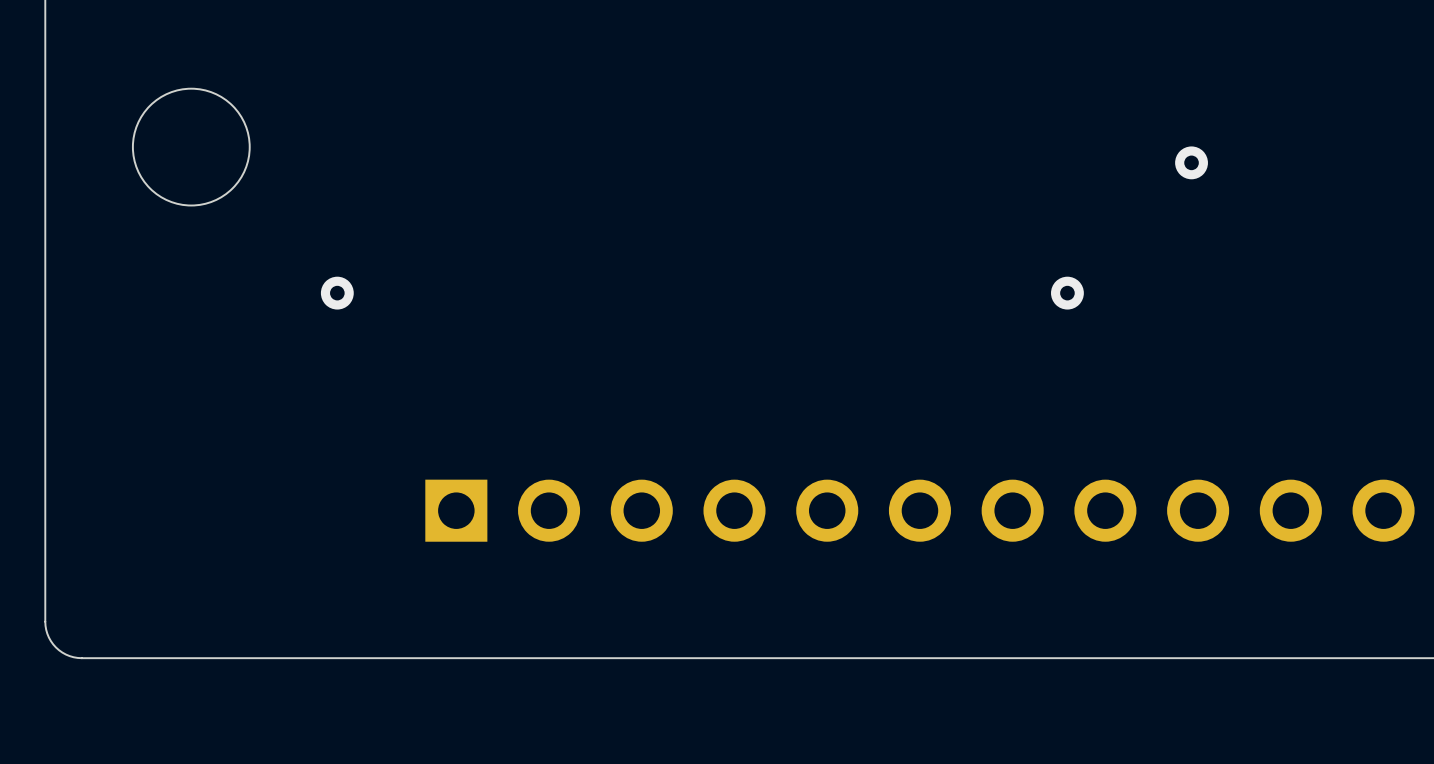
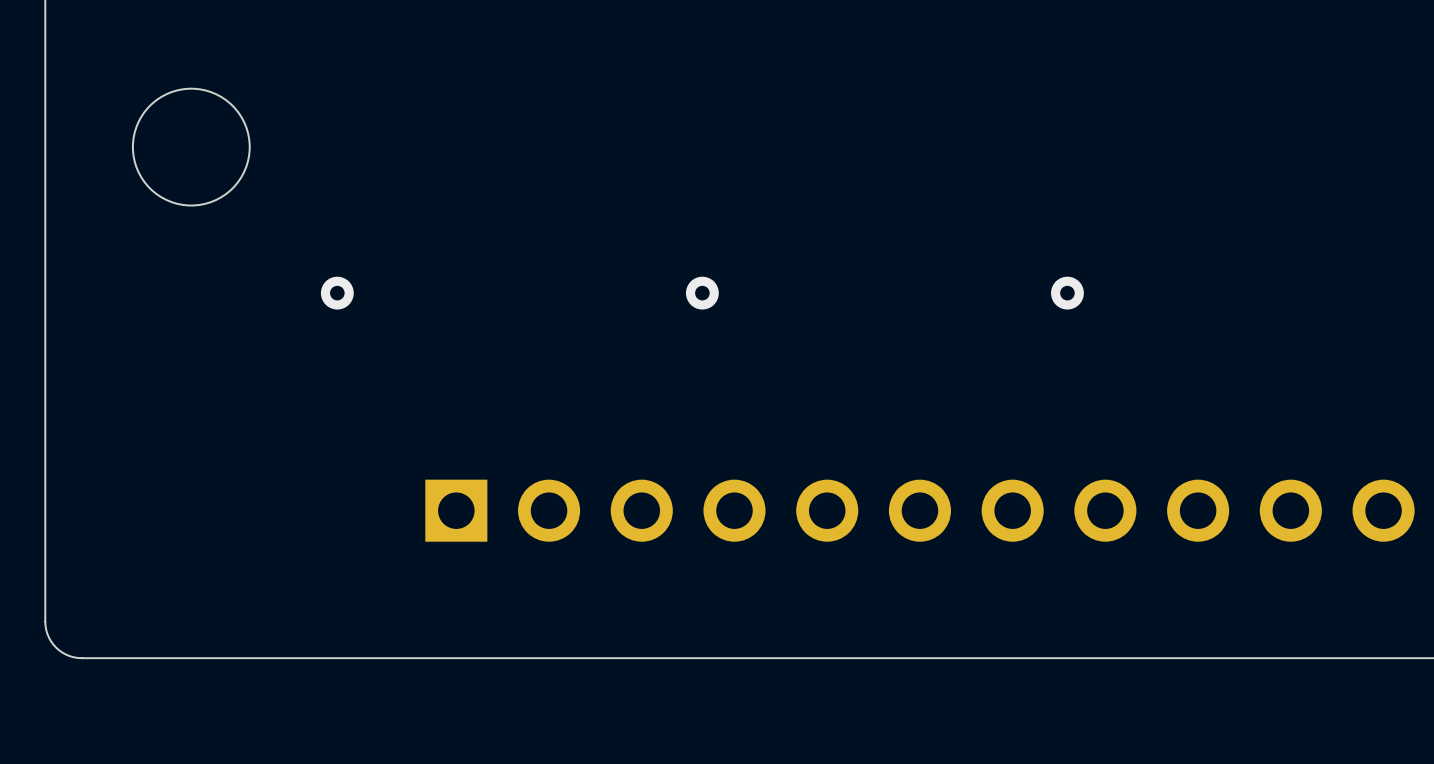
via: (1191, 162) -> none
via: none -> (702, 293)

